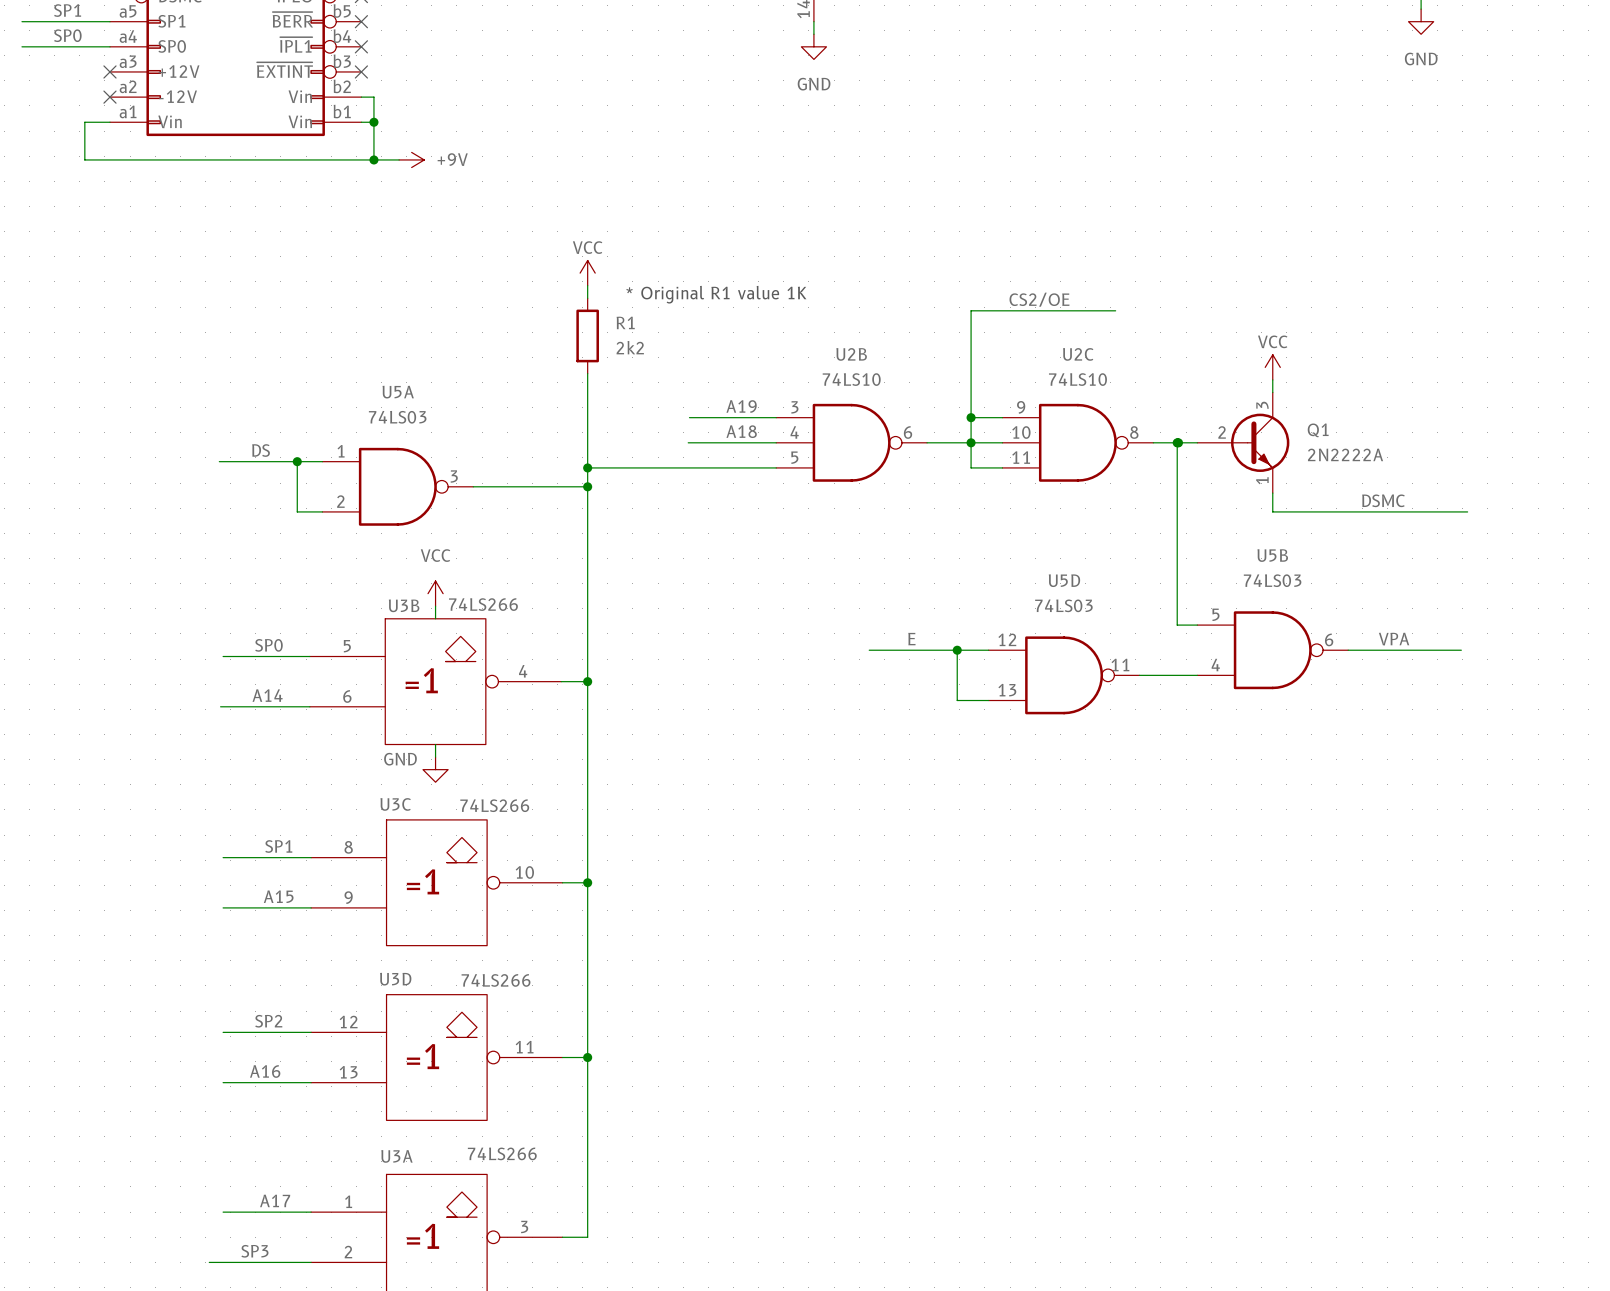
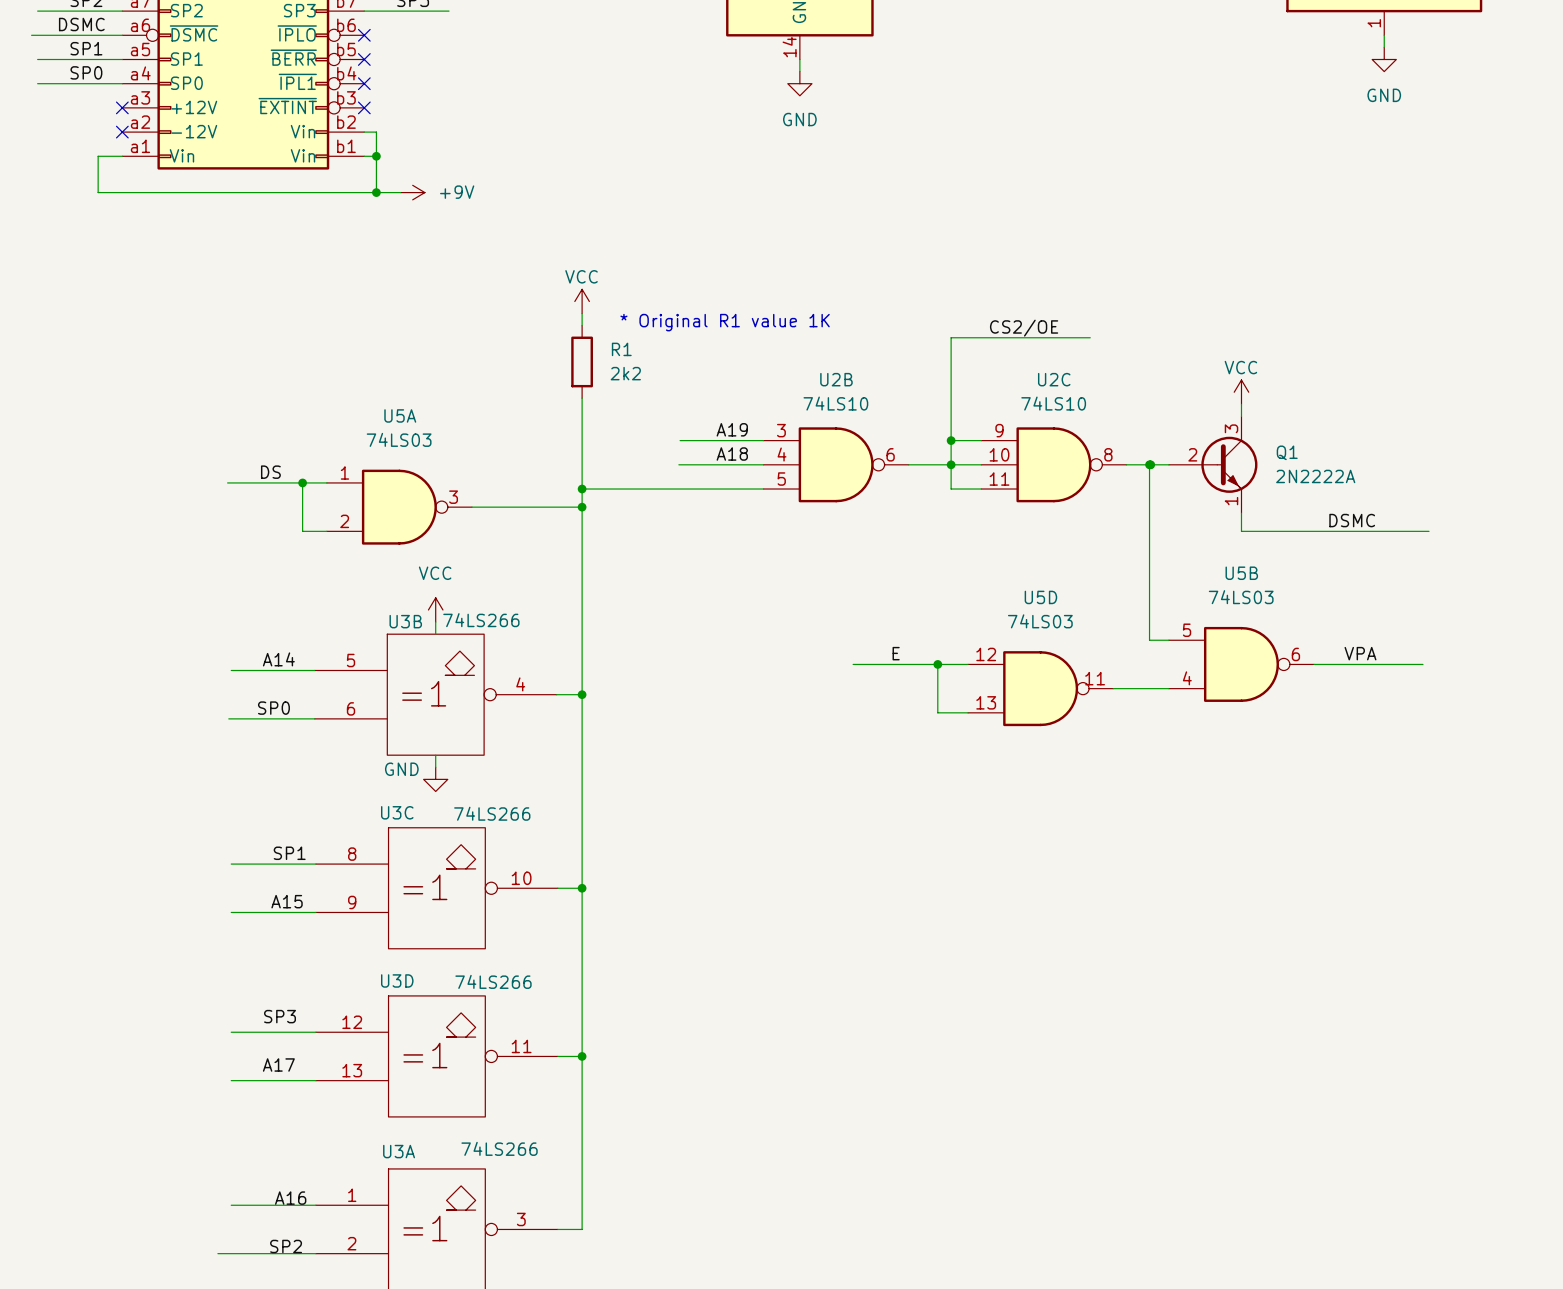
label: SP0 (268, 645) -> A14 (278, 659)
label: A14 (267, 695) -> SP0 (273, 708)
label: SP2 (268, 1021) -> SP3 (280, 1016)
label: A16 (265, 1071) -> A17 (278, 1065)
label: A17 (275, 1200) -> A16 (290, 1198)
label: SP3 (254, 1251) -> SP2 (286, 1246)

